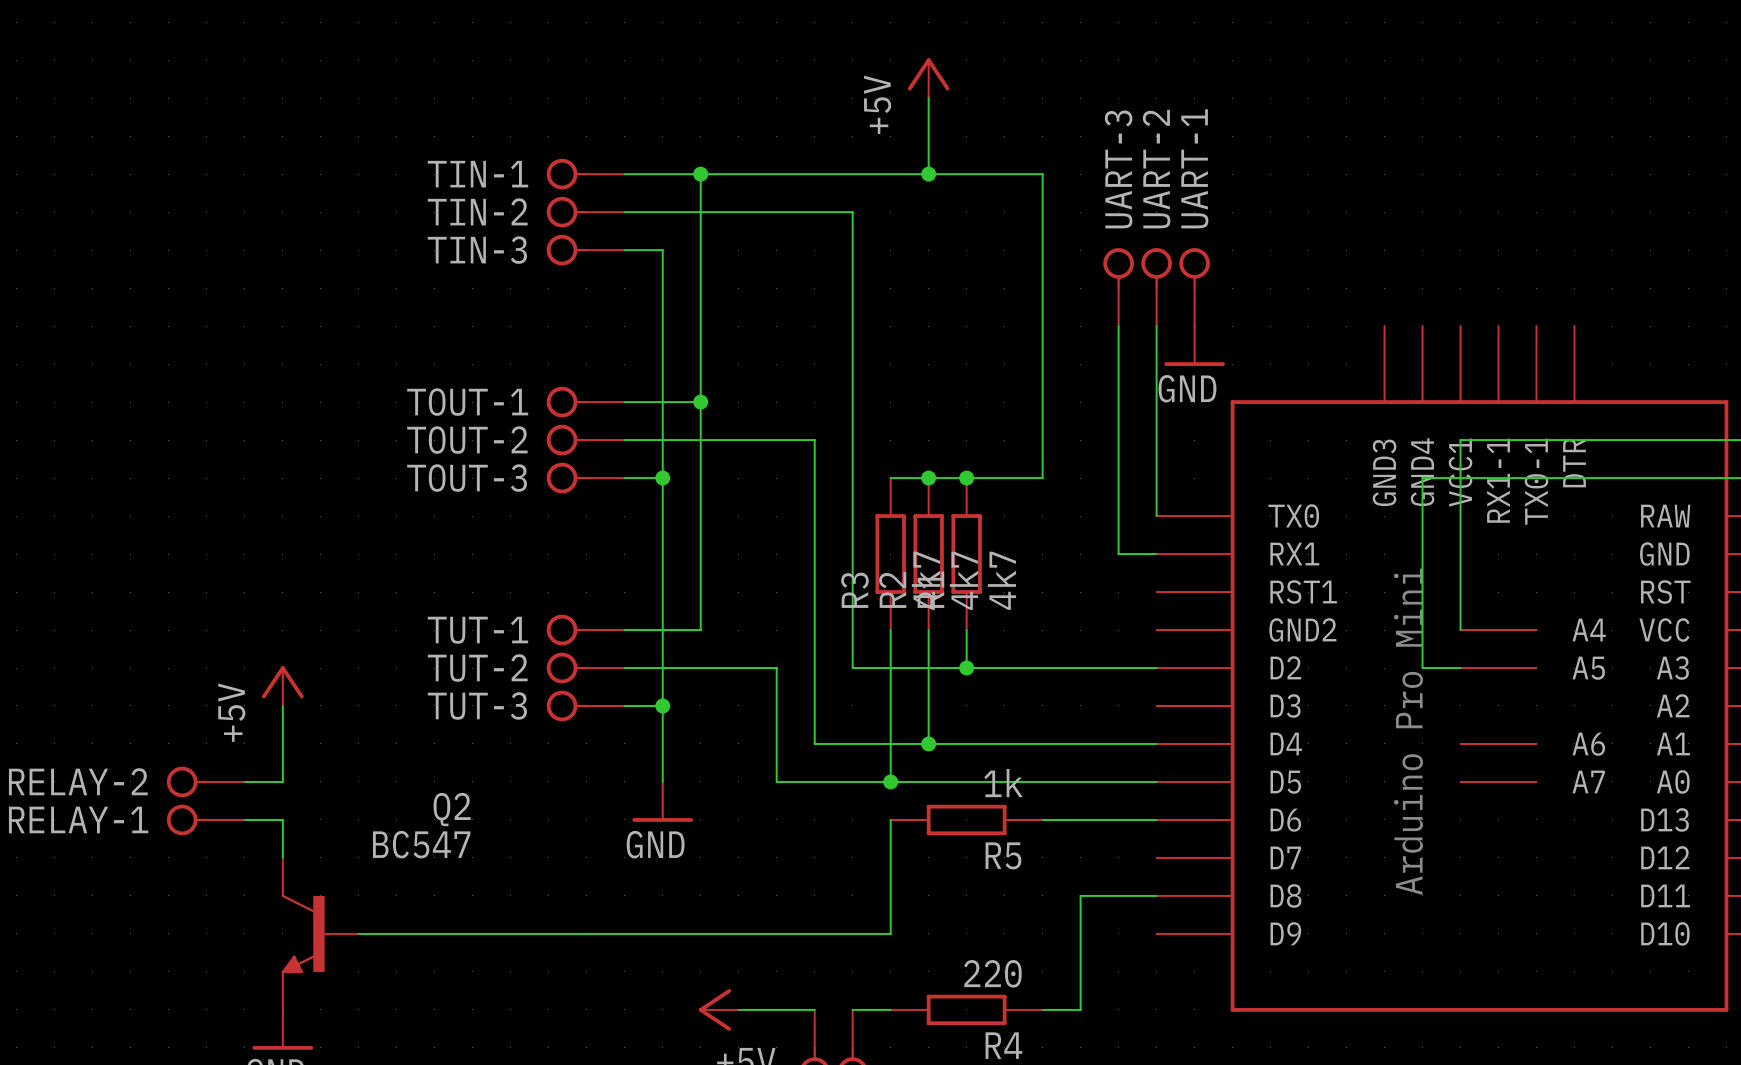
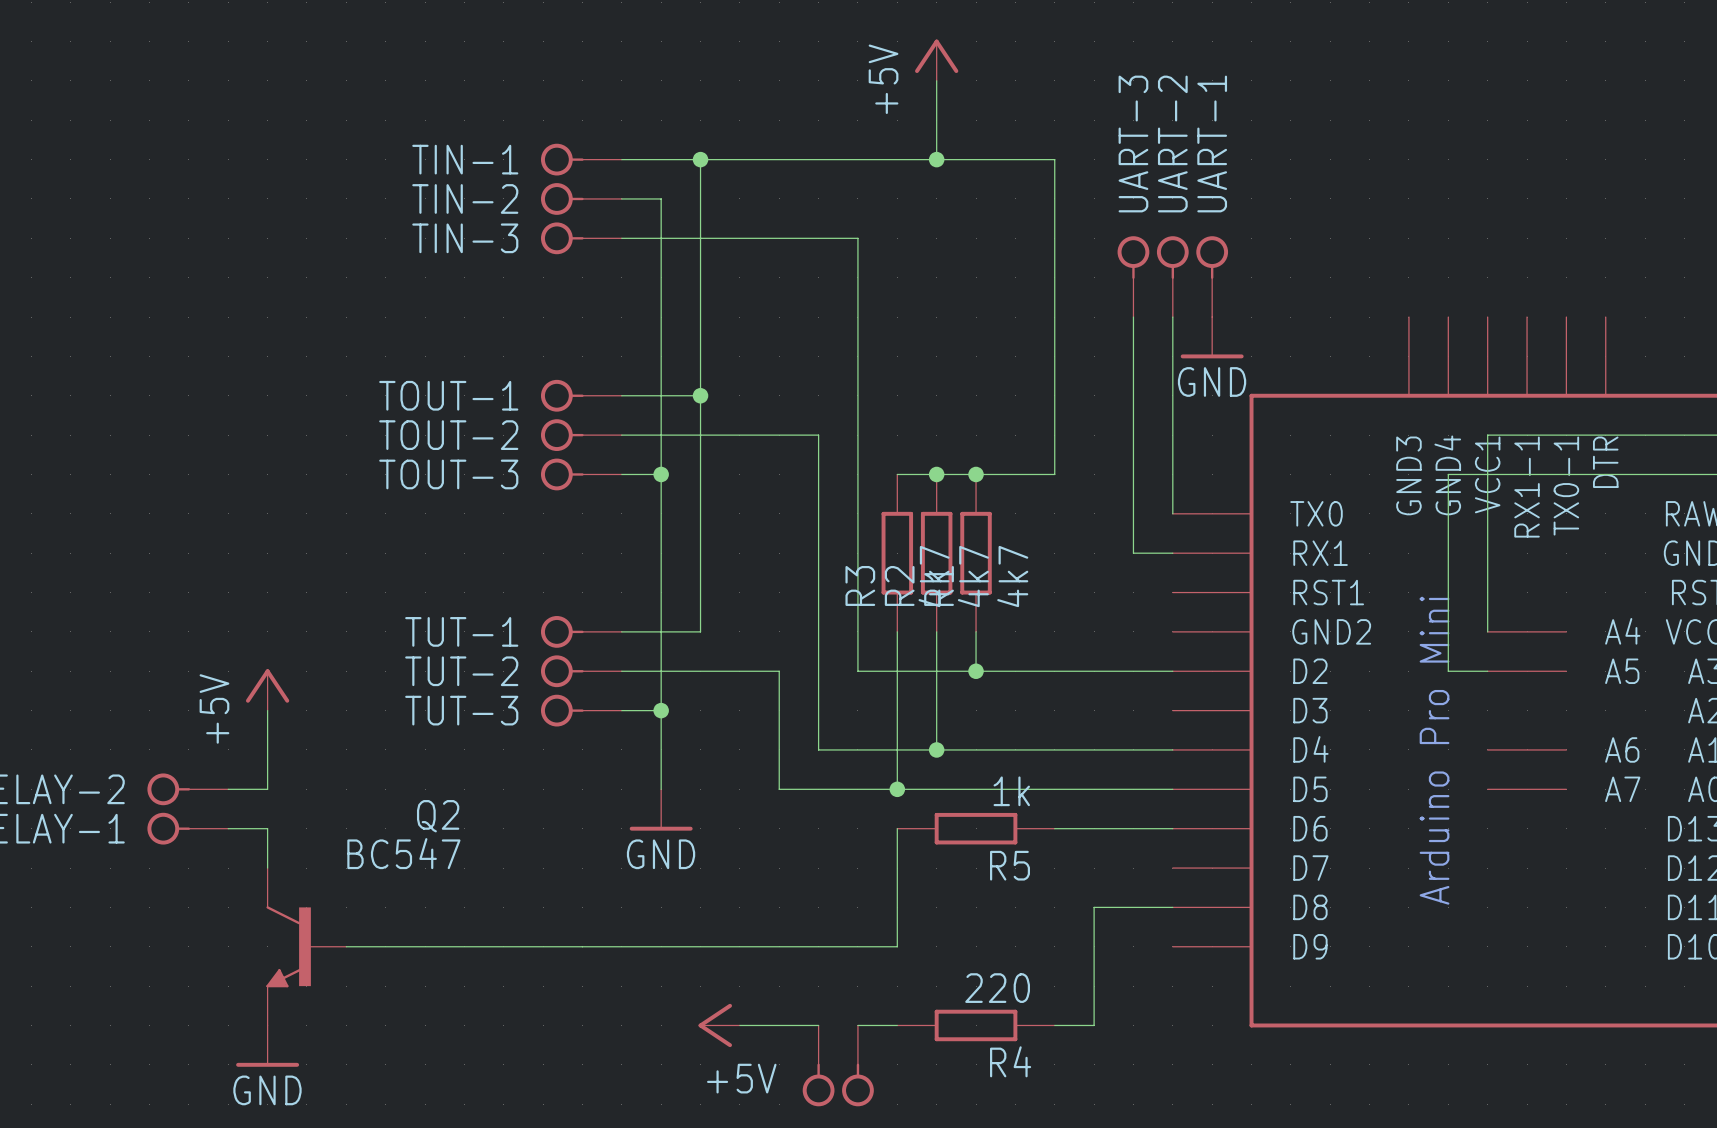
wire: (662, 212) (852, 212) (852, 250) -> (661, 198) (661, 238) (857, 238)

